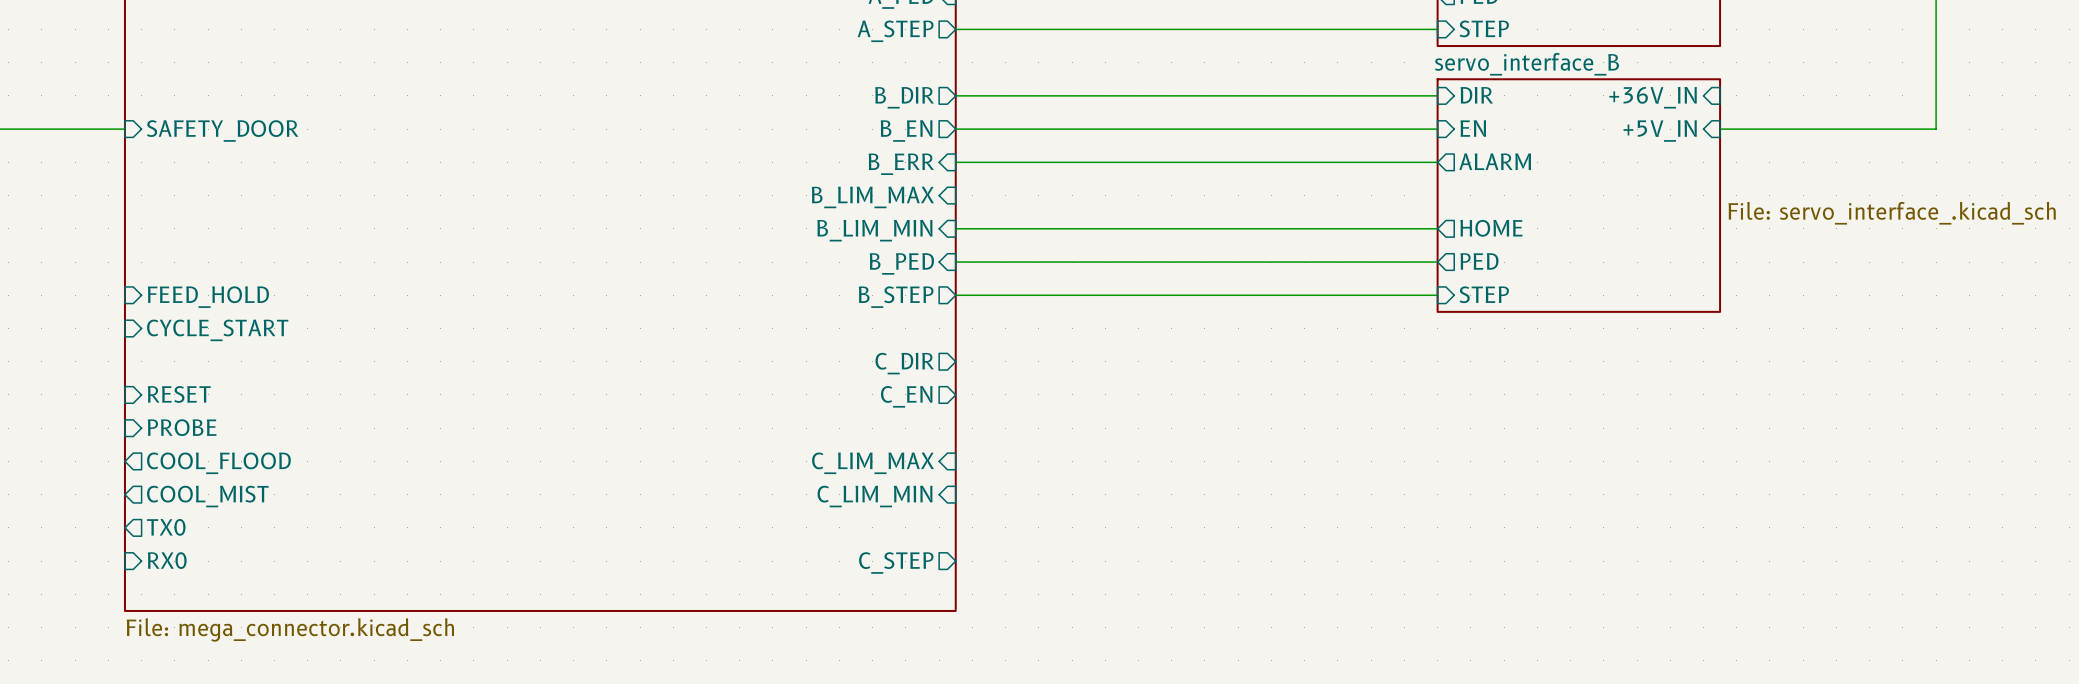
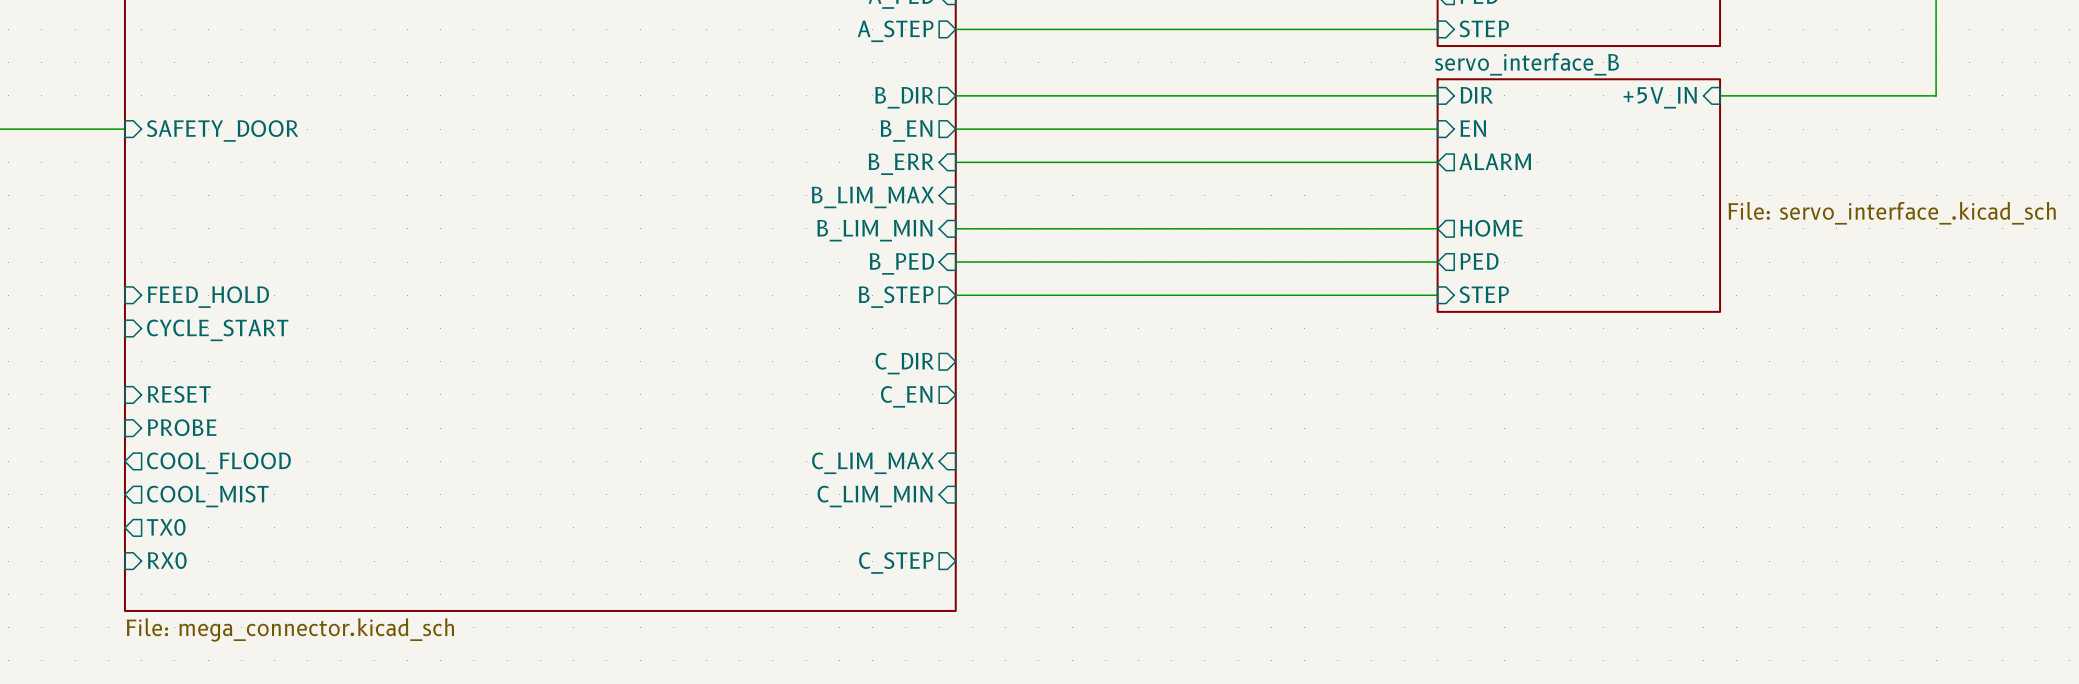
wire: (1936, 95) (1936, 129) (1720, 129) -> (1936, 95) (1720, 95)
sheet pin: +36V_IN (1653, 97) -> +5V_IN (1660, 97)
sheet pin: +5V_IN (1660, 130) -> none

